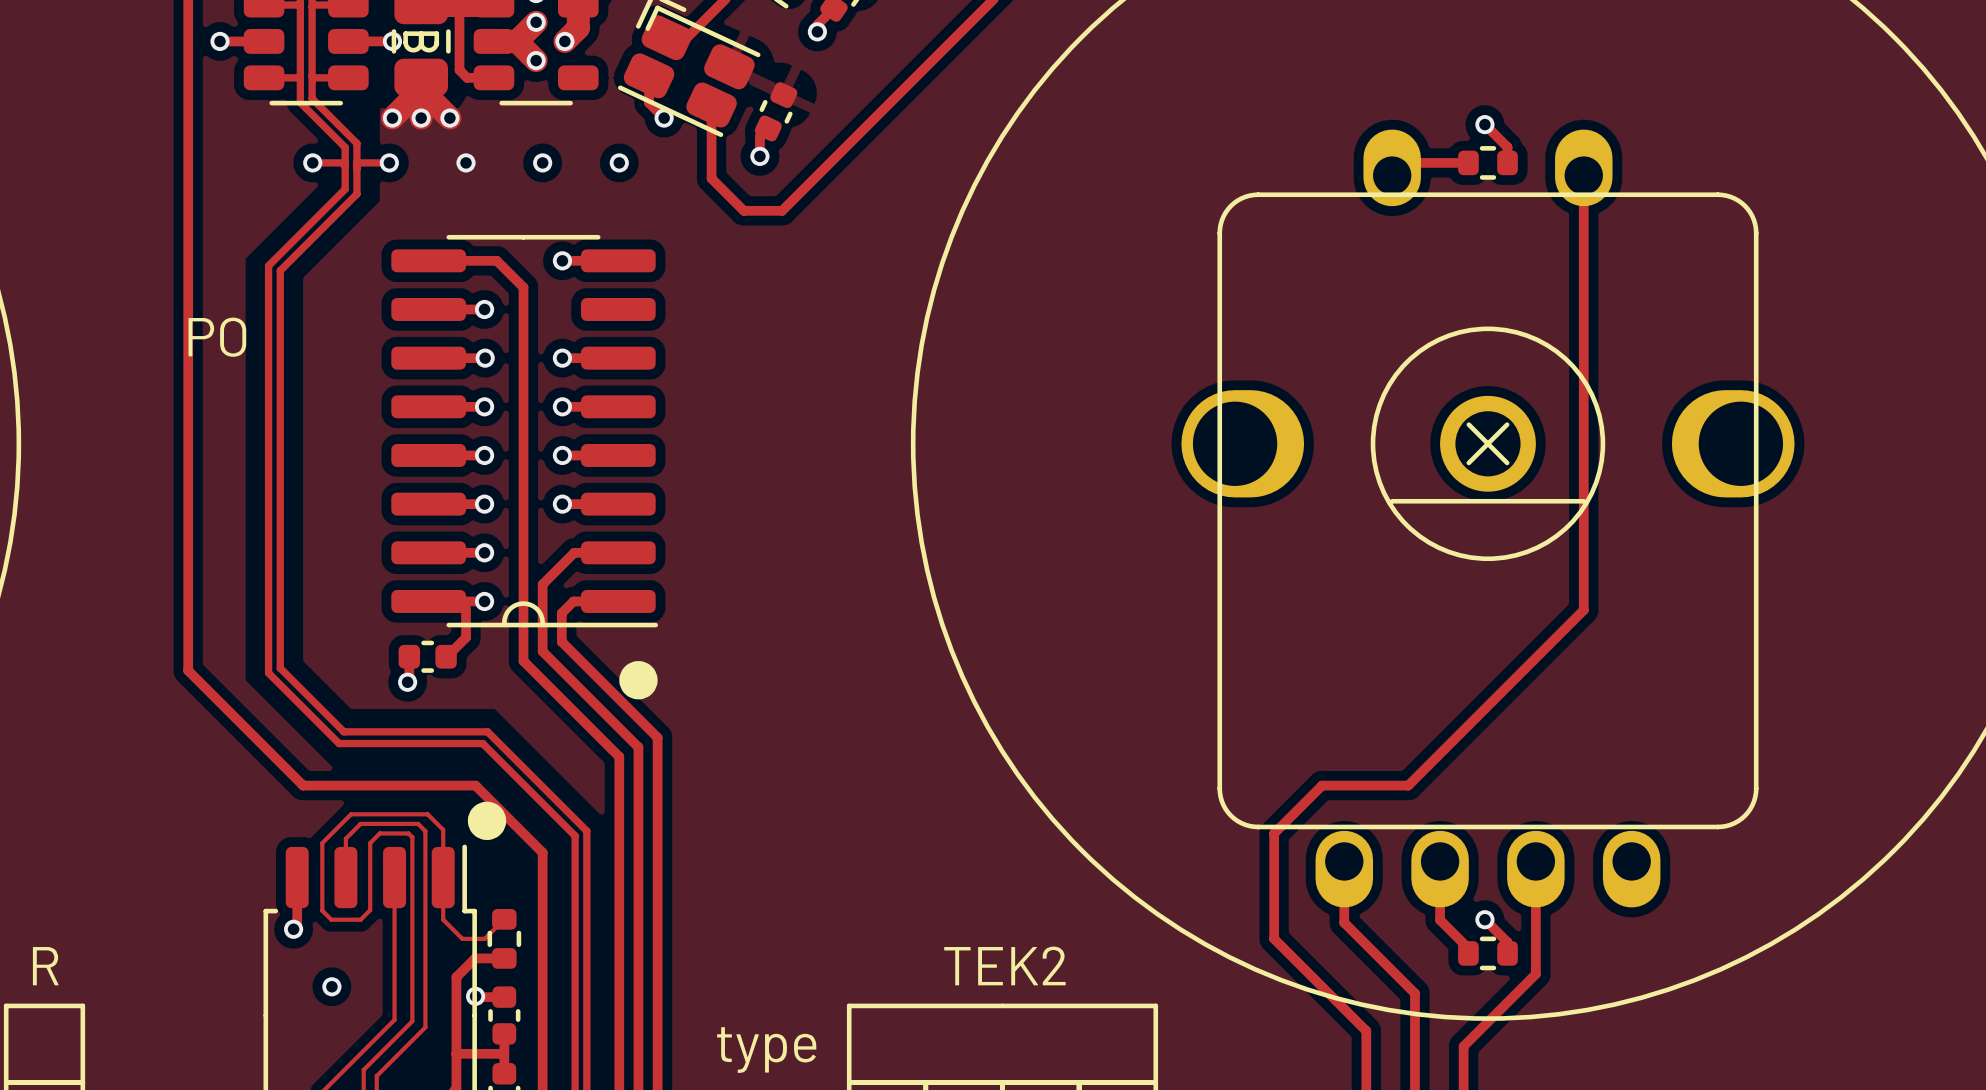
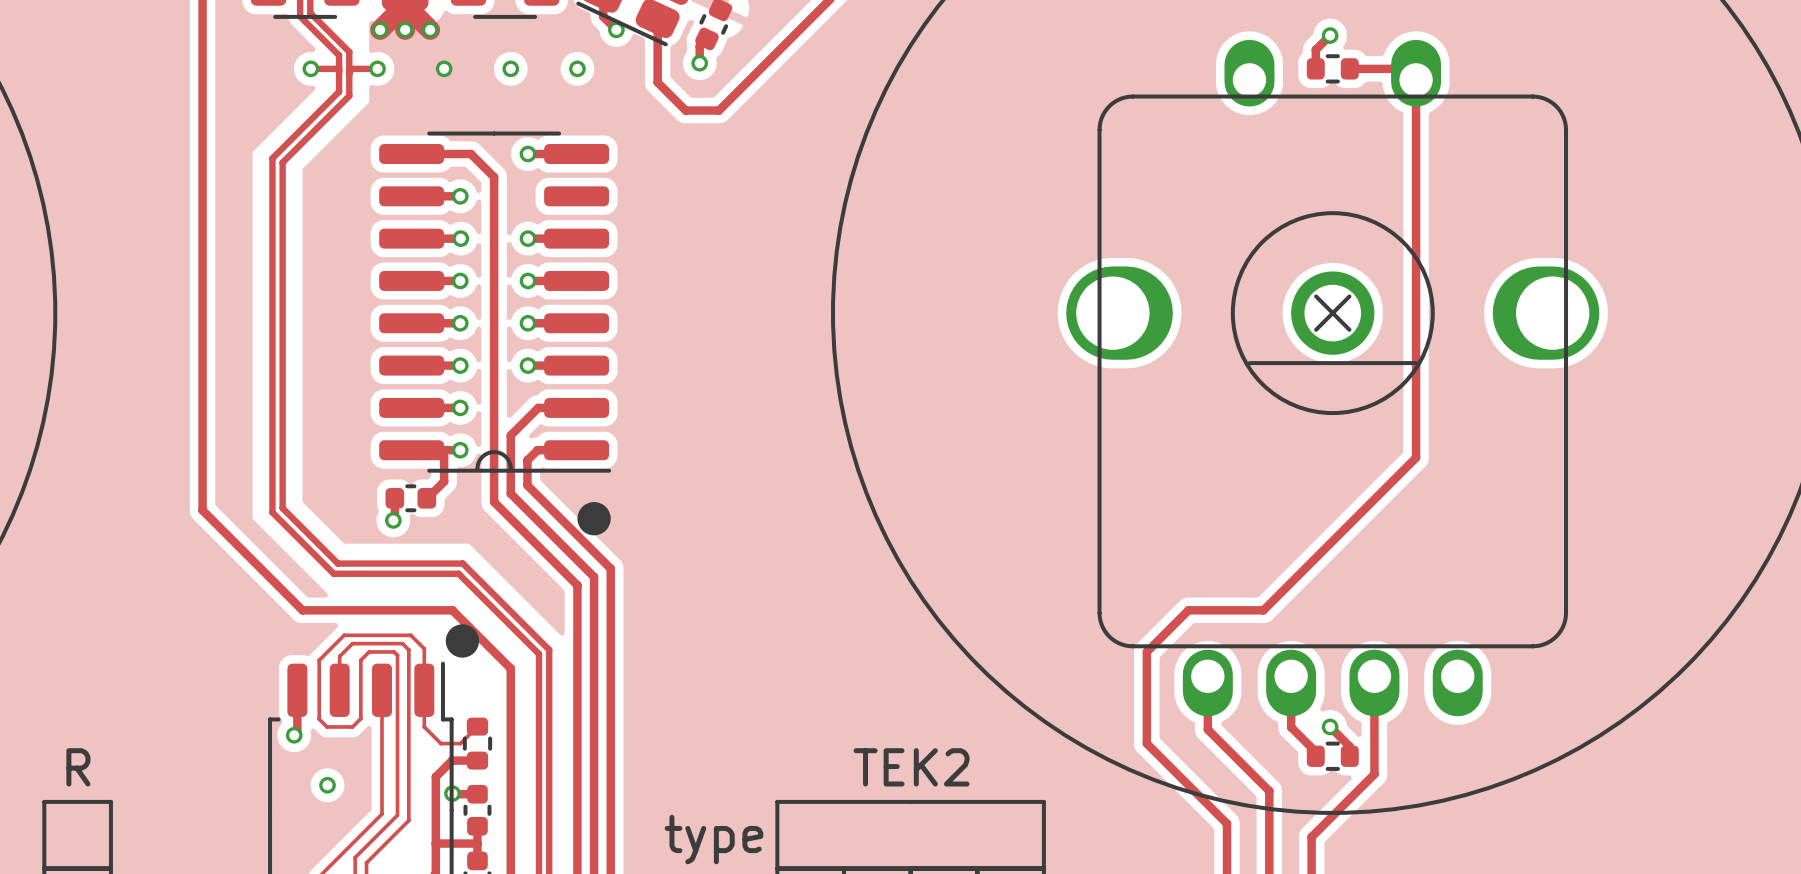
track: (1484, 124) (1507, 147) (1507, 162) -> (1330, 35) (1315, 49) (1315, 68)
track: (1404, 162) (1468, 162) -> none
track: none -> (1349, 68) (1405, 68) (1416, 79)
text: PO (217, 337) -> none

